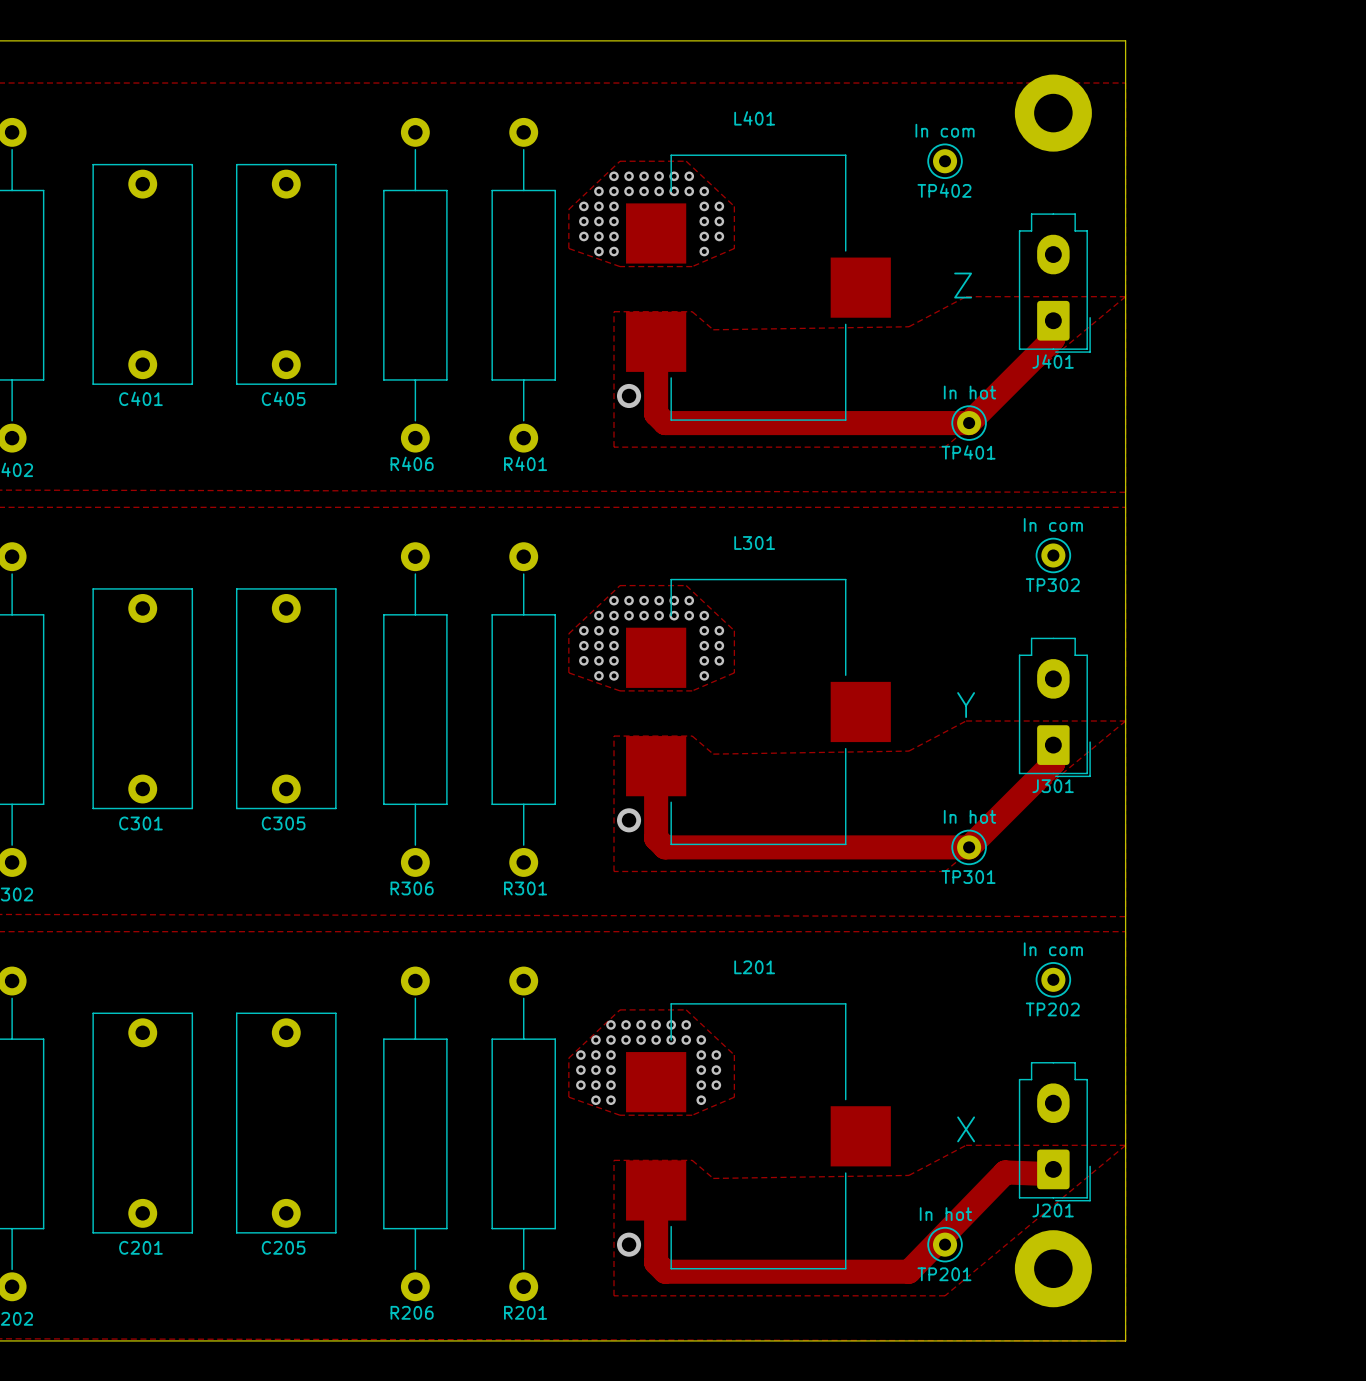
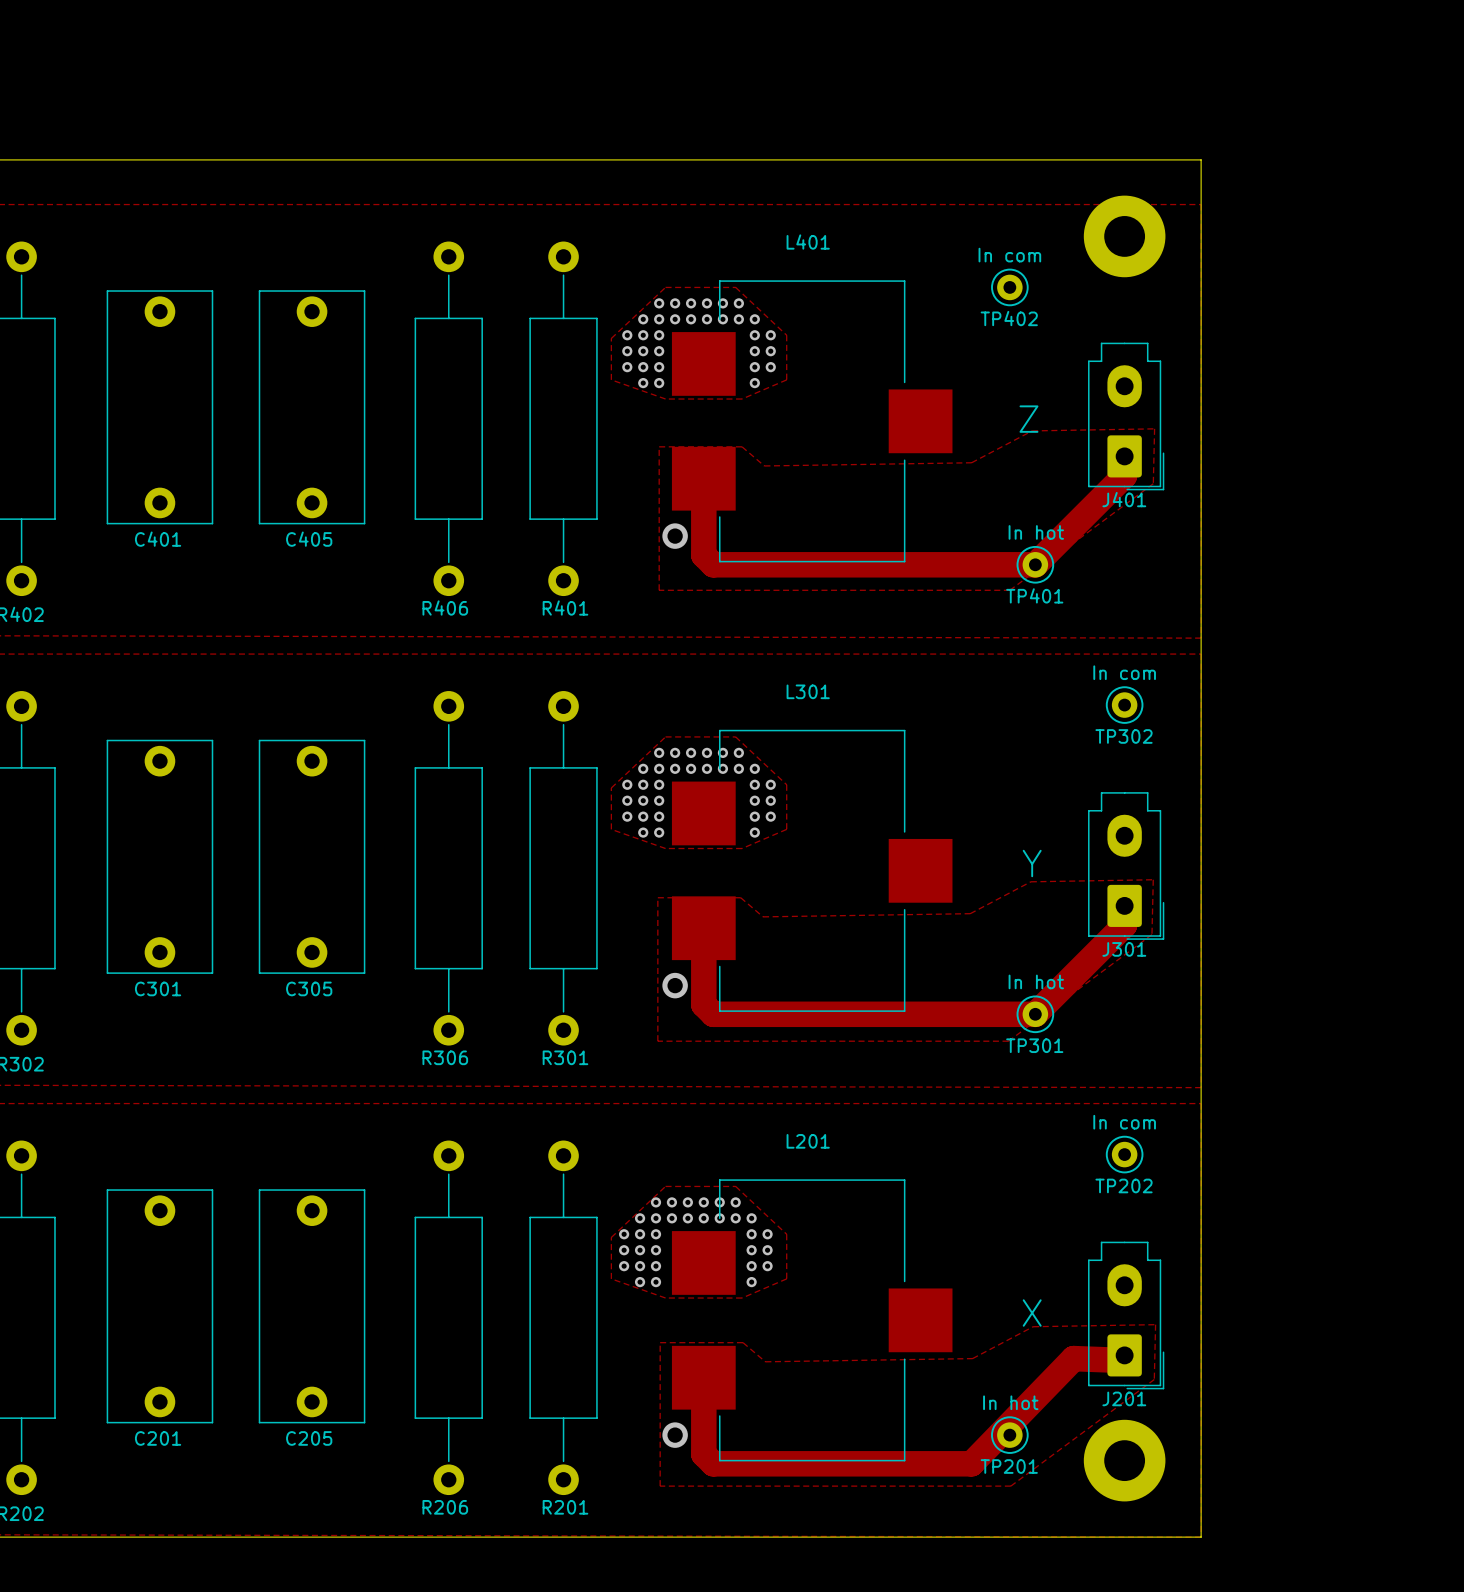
zone outline: (966, 296) (1125, 296) (945, 447) -> (1032, 430) (1154, 428) (1153, 483) (1009, 590)
zone outline: (966, 721) (908, 751) (713, 754) (692, 736) (614, 736) (614, 871) (945, 871) (1125, 721) (966, 721) -> (1153, 879) (1030, 881) (970, 913) (763, 916) (740, 897) (657, 897) (657, 1041) (1008, 1041) (1151, 934) (1153, 879)
zone outline: (966, 1145) (908, 1175) (713, 1178) (692, 1160) (614, 1160) (614, 1295) (945, 1295) (1125, 1145) (966, 1145) -> (1155, 1324) (1033, 1326) (972, 1358) (765, 1361) (743, 1342) (660, 1342) (660, 1486) (1010, 1486) (1154, 1379) (1155, 1324)

